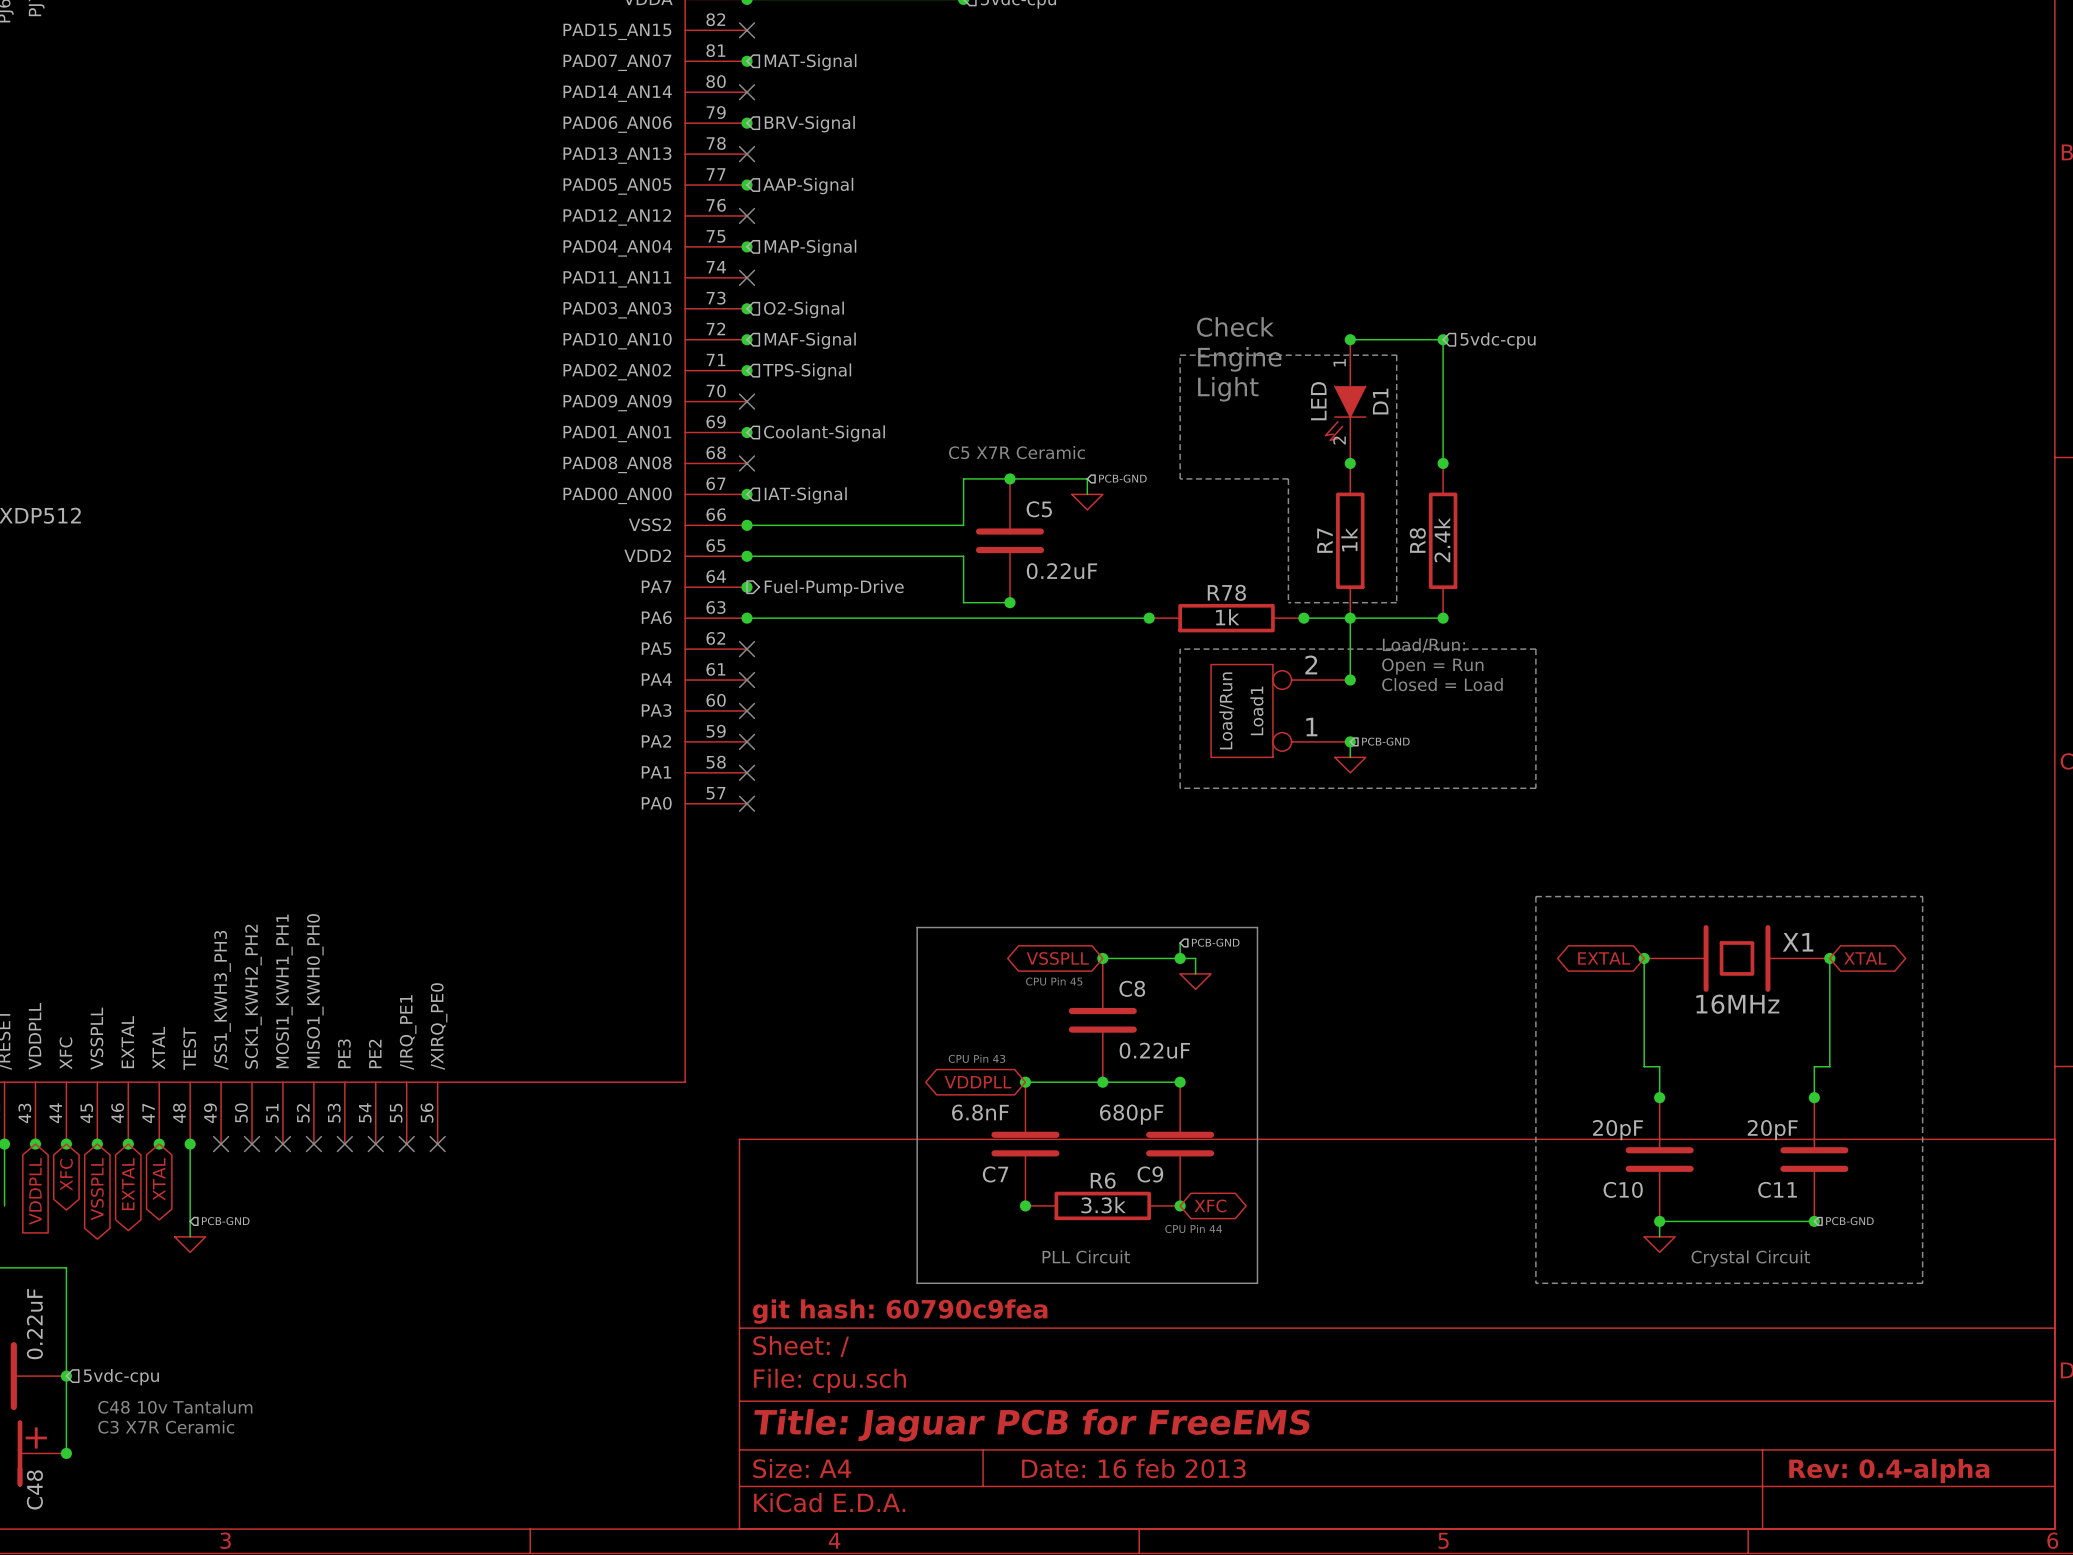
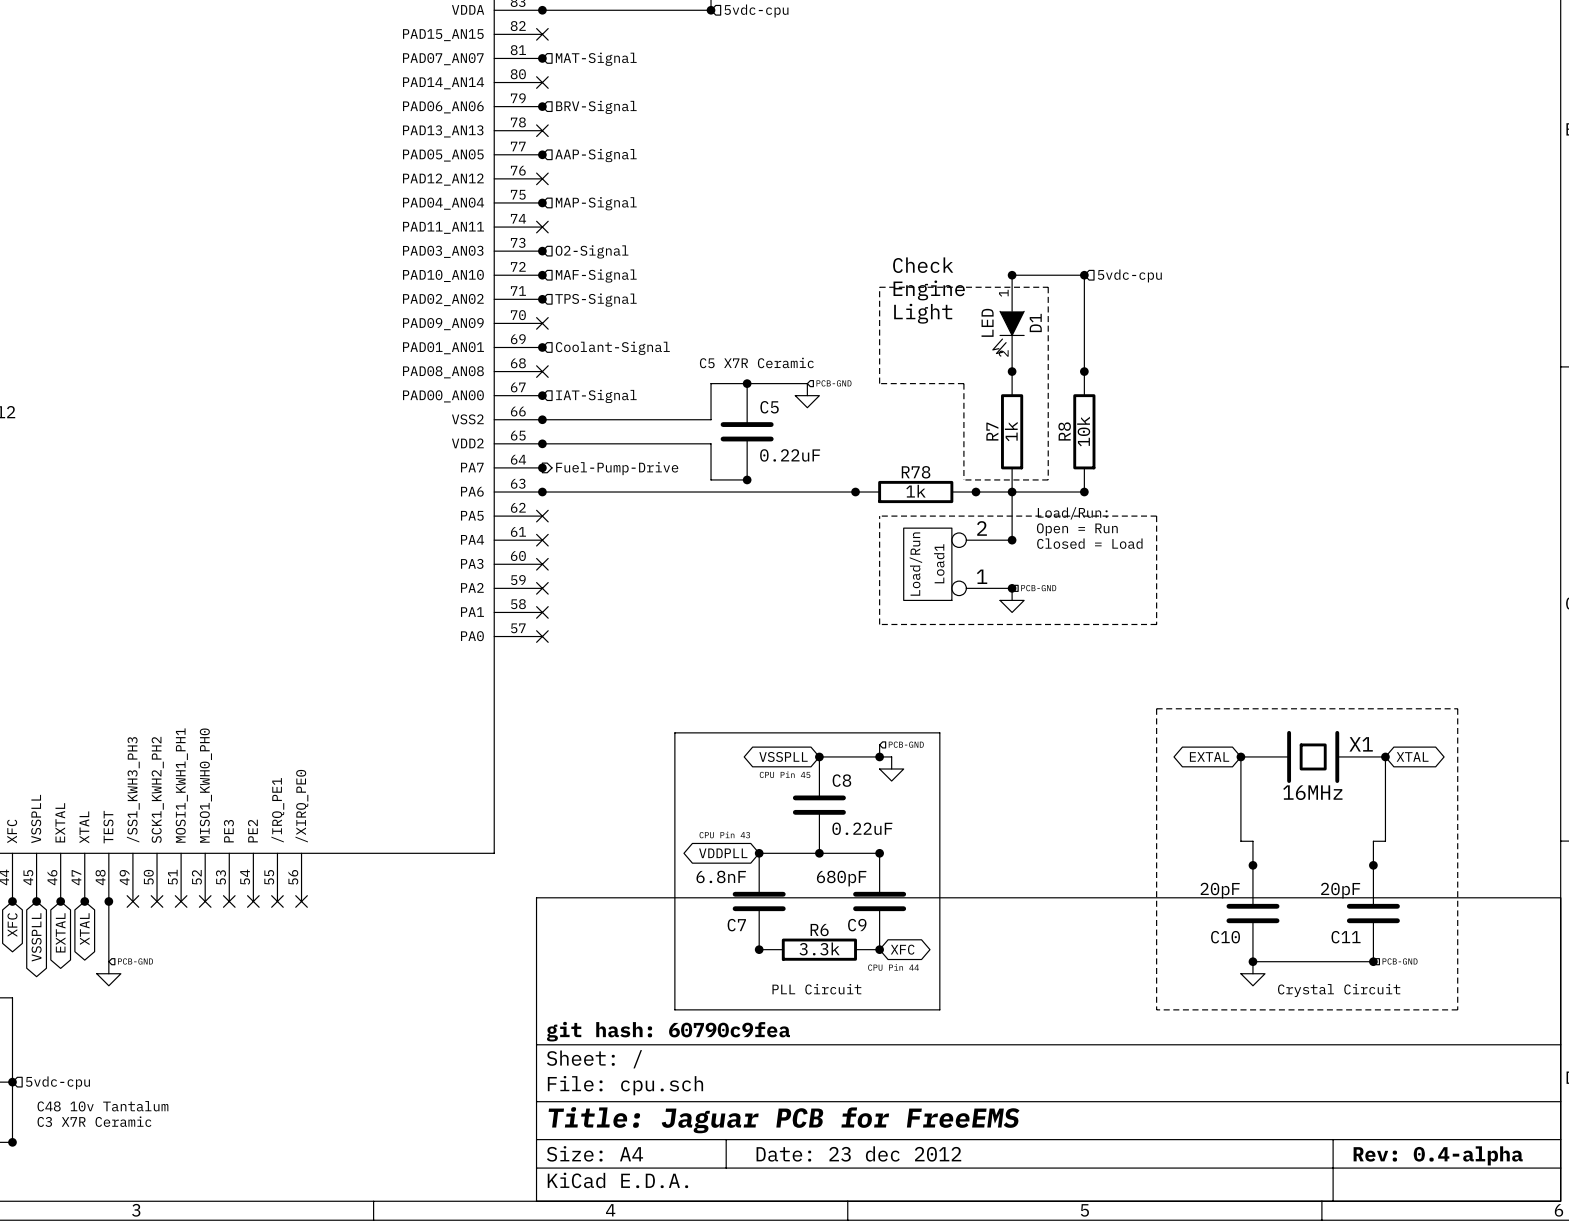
R8 value: 2.4k (1442, 540) -> 10k (1083, 431)
title block: Date: 16 feb 2013 (1133, 1468) -> Date: 23 dec 2012 (858, 1153)

